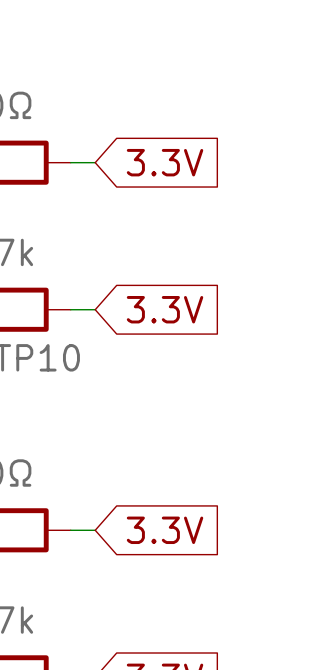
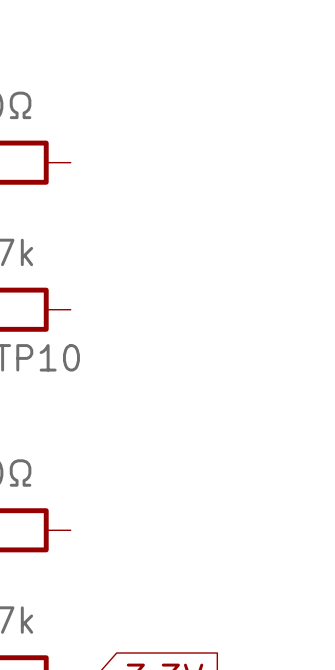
wire: (70, 162) (95, 162) -> none
global label: 3.3V (165, 162) -> none
wire: (70, 309) (95, 309) -> none
global label: 3.3V (165, 309) -> none
wire: (70, 530) (95, 530) -> none
global label: 3.3V (165, 530) -> none

